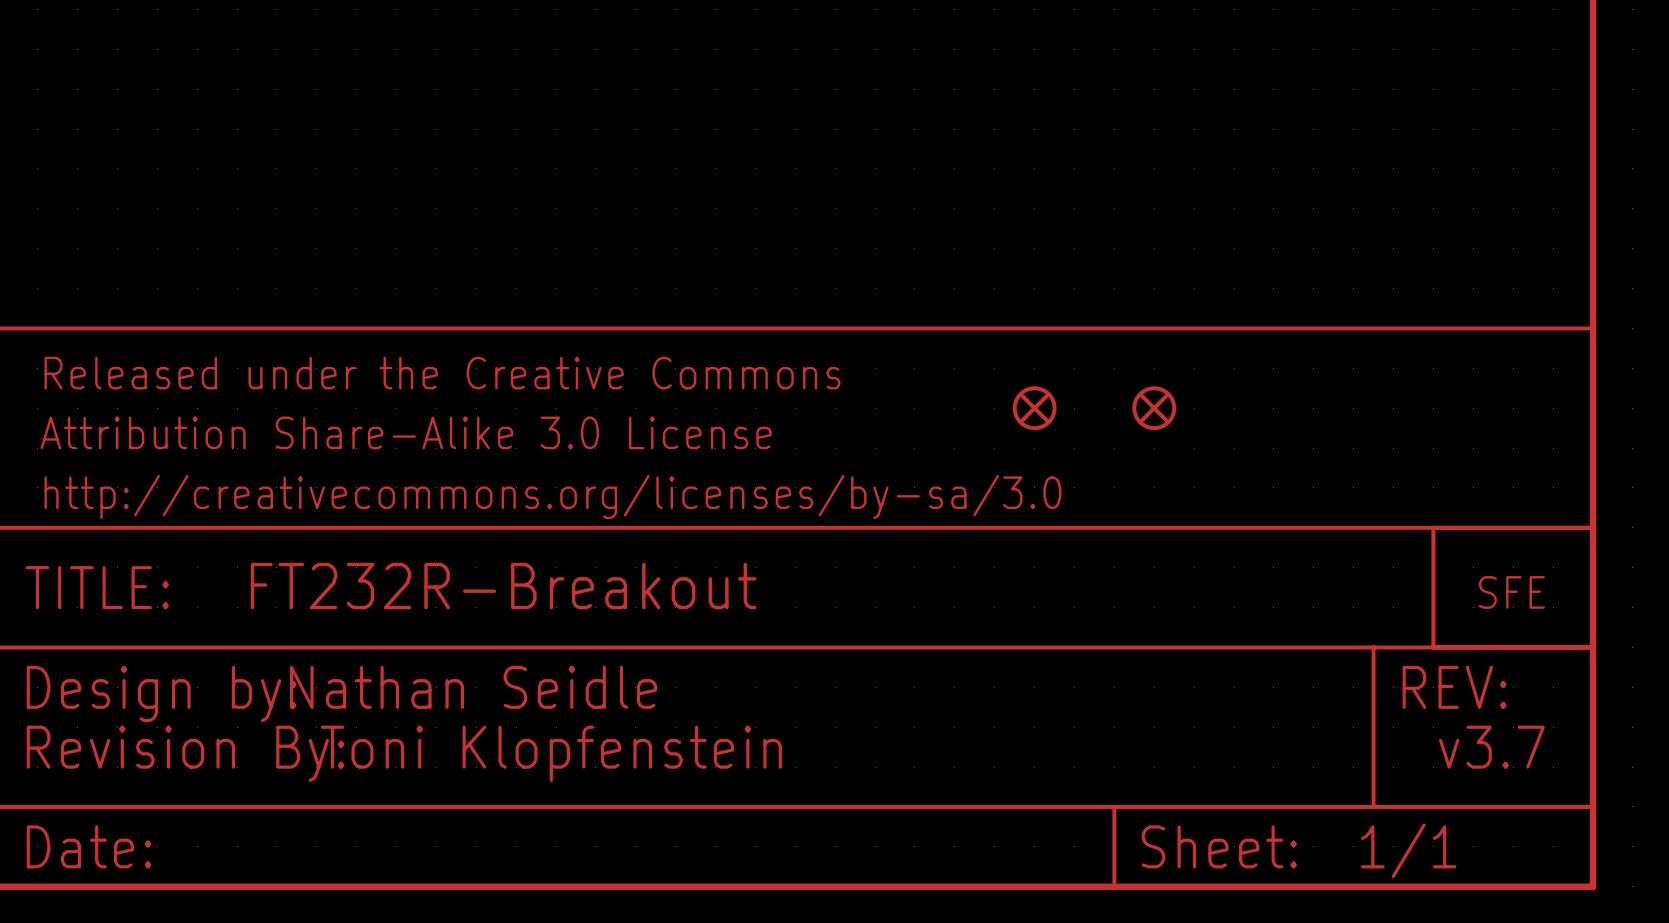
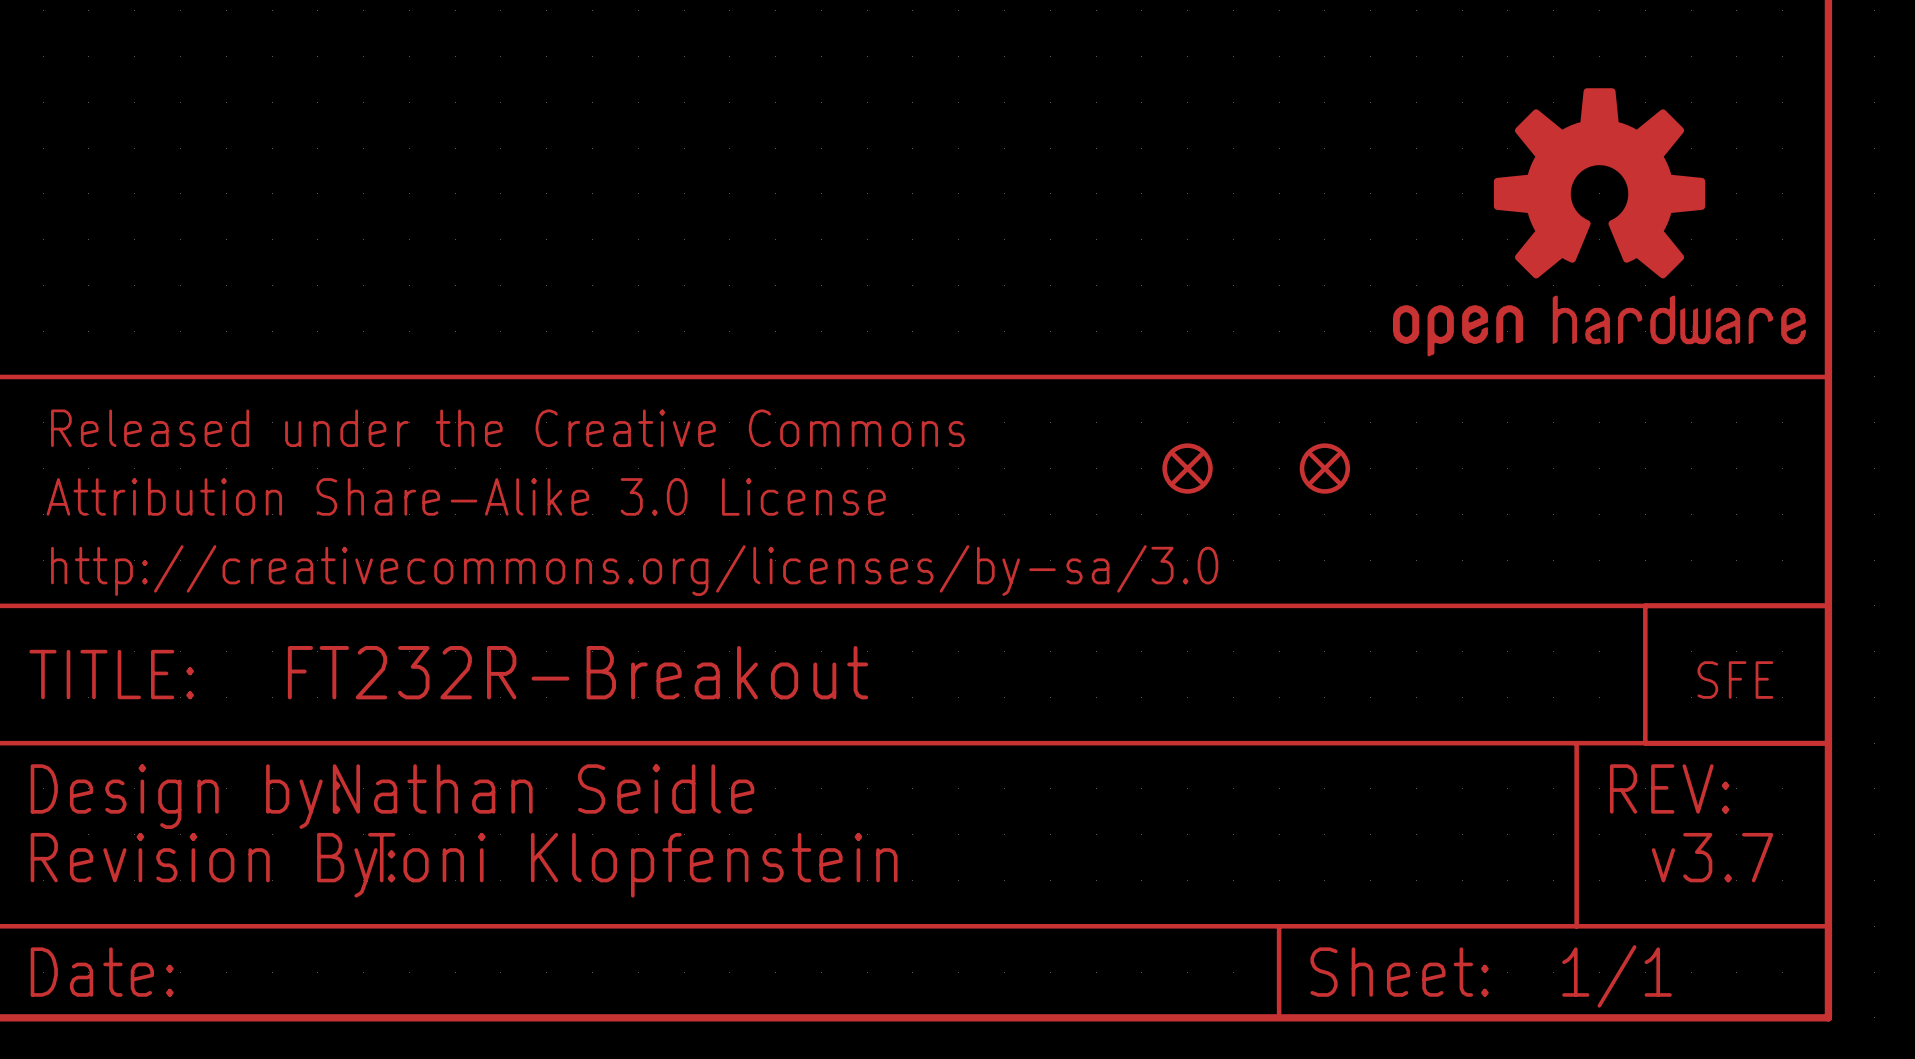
part: none -> (1599, 222)

